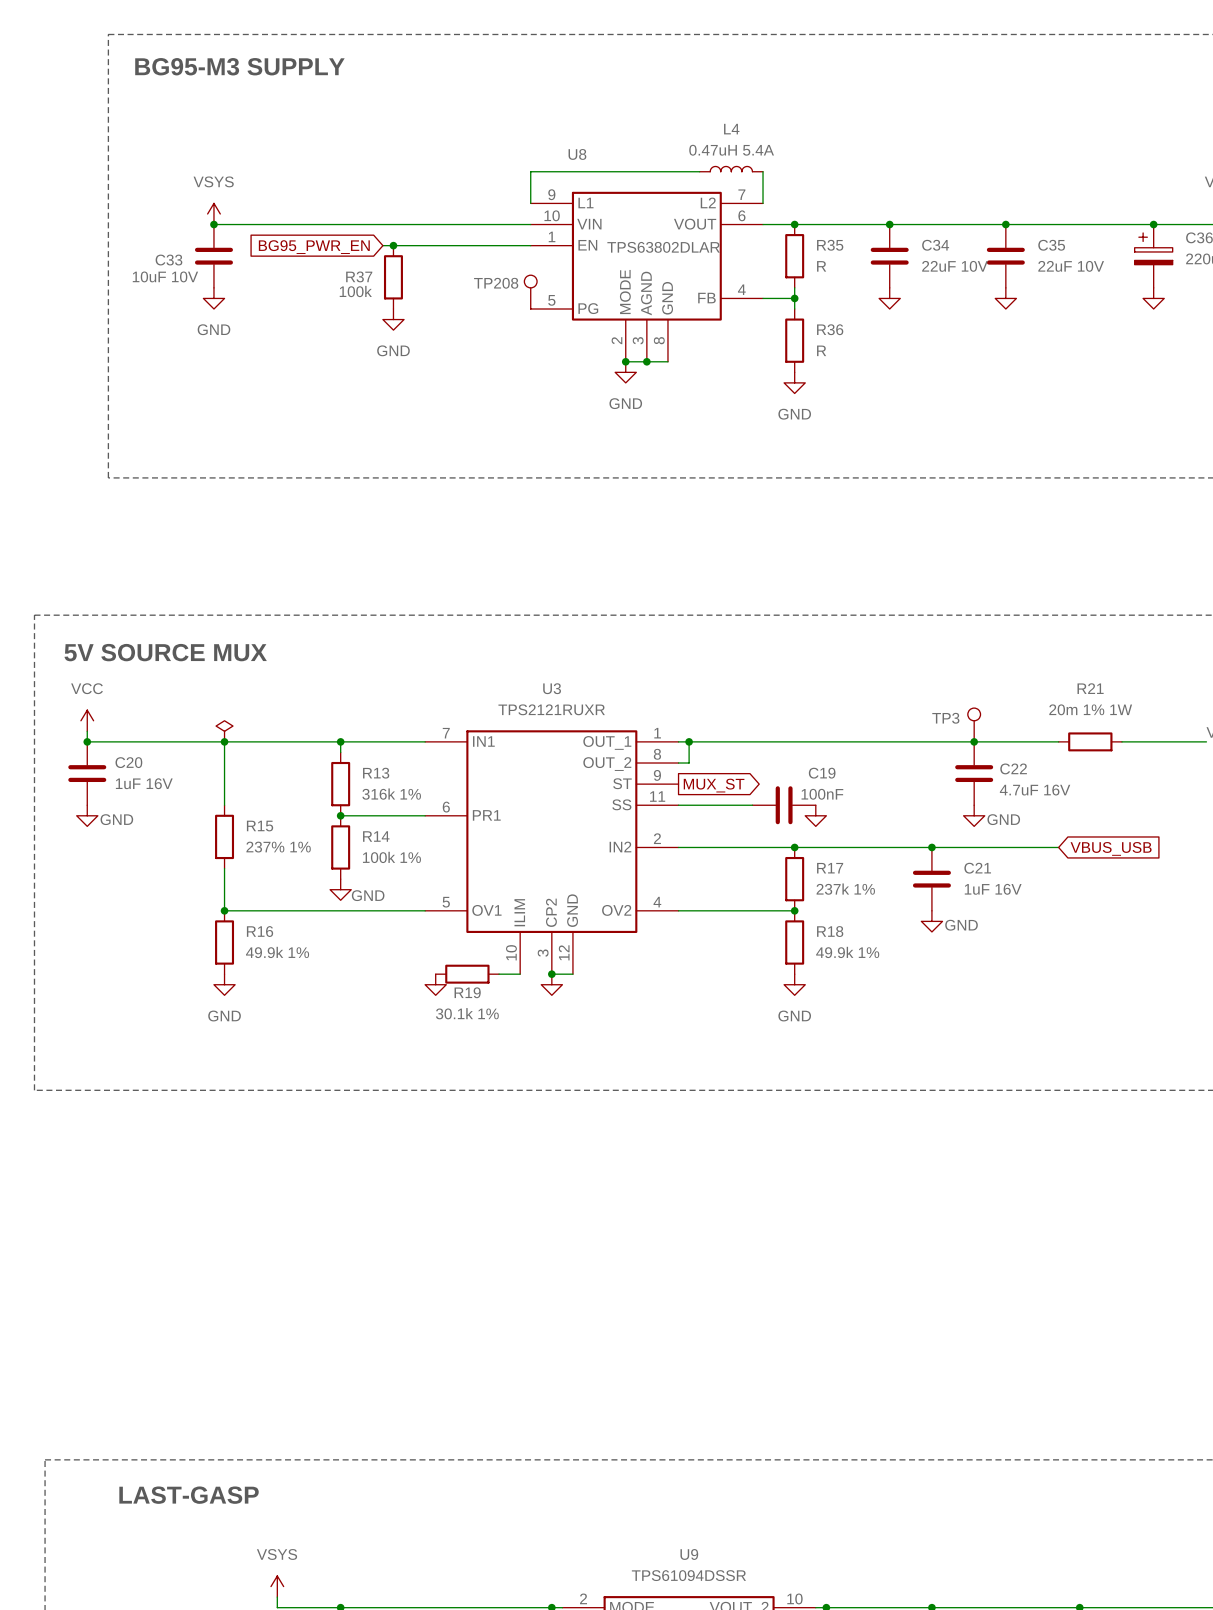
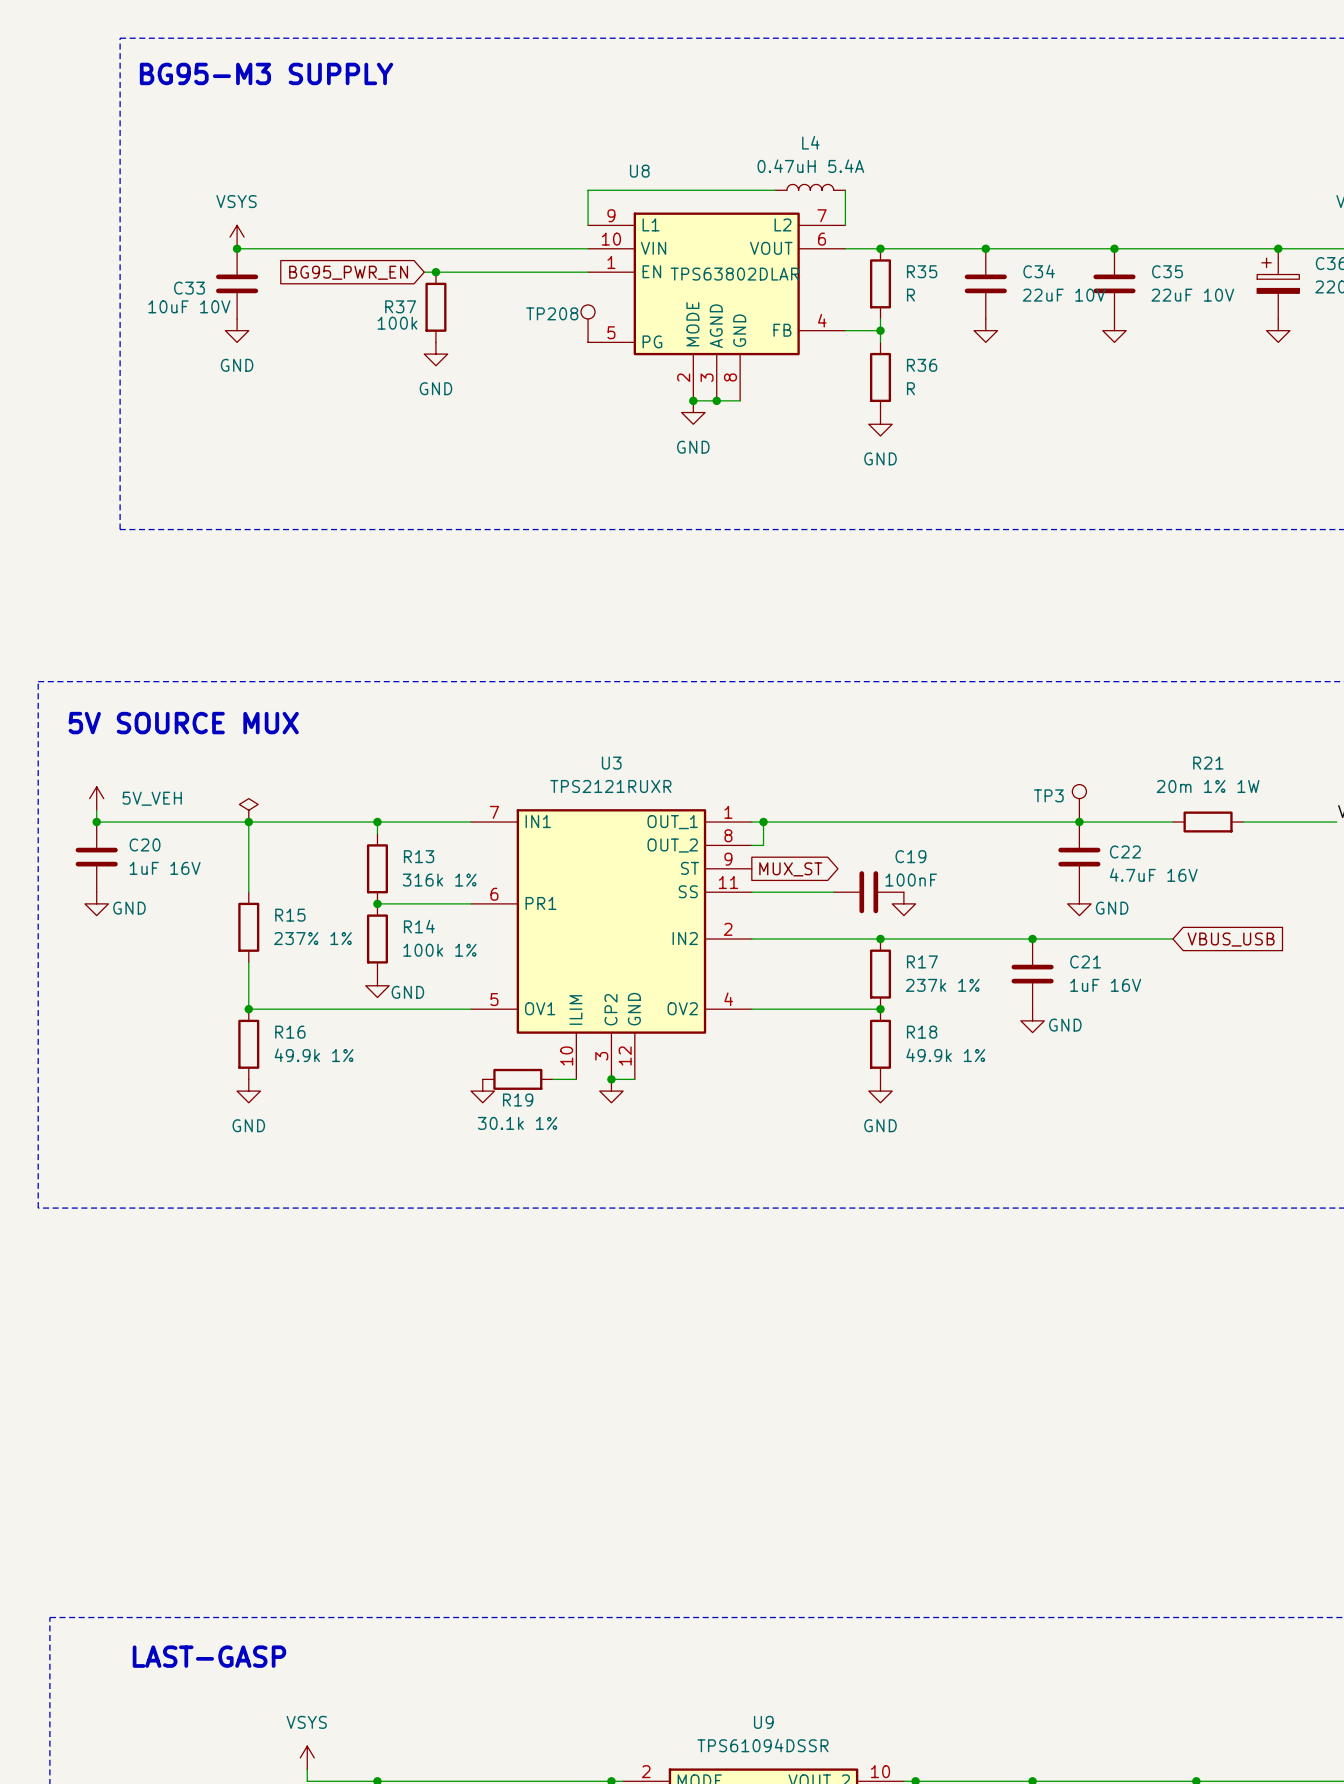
power symbol: VCC (87, 720) -> 5V_VEH (96, 798)

